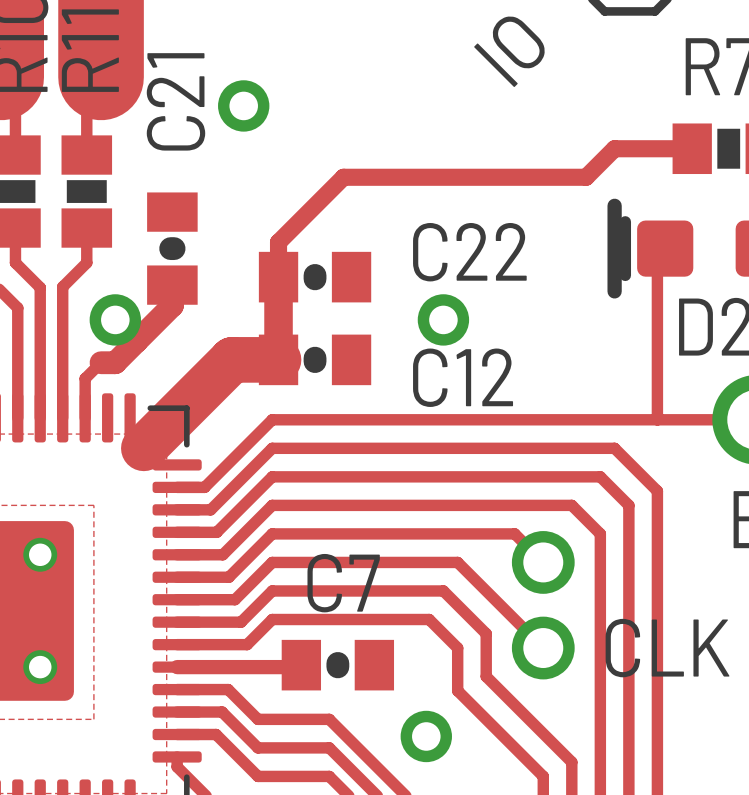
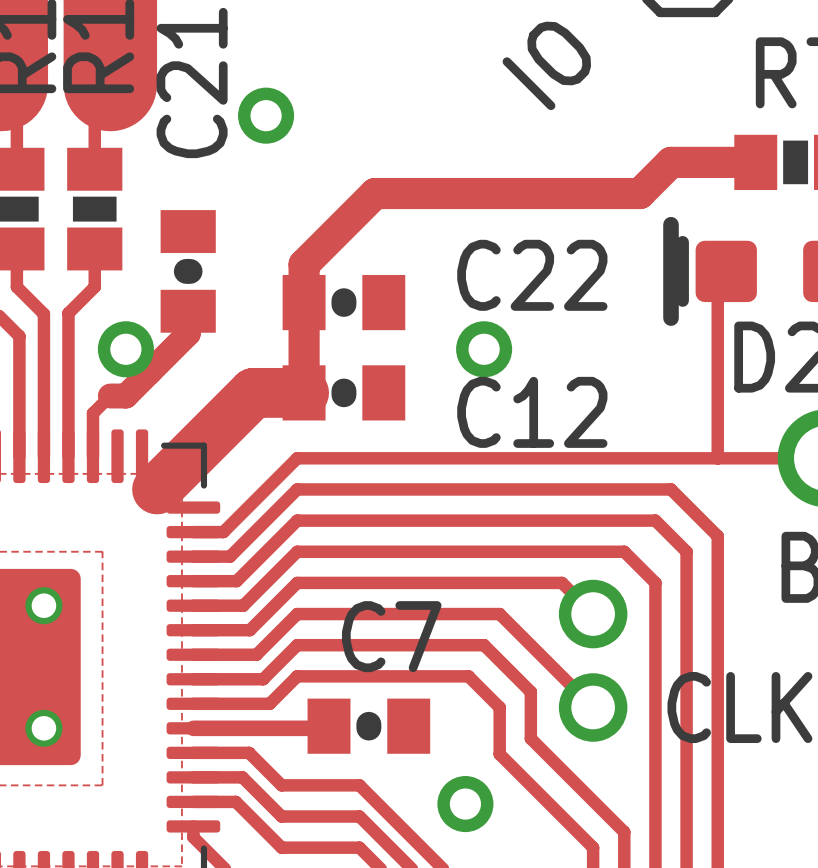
track width: thin (692, 148) (614, 148) (586, 177) (343, 177) (278, 242) (278, 277) -> thick (755, 162) (671, 162) (639, 193) (375, 193) (304, 264) (304, 302)

